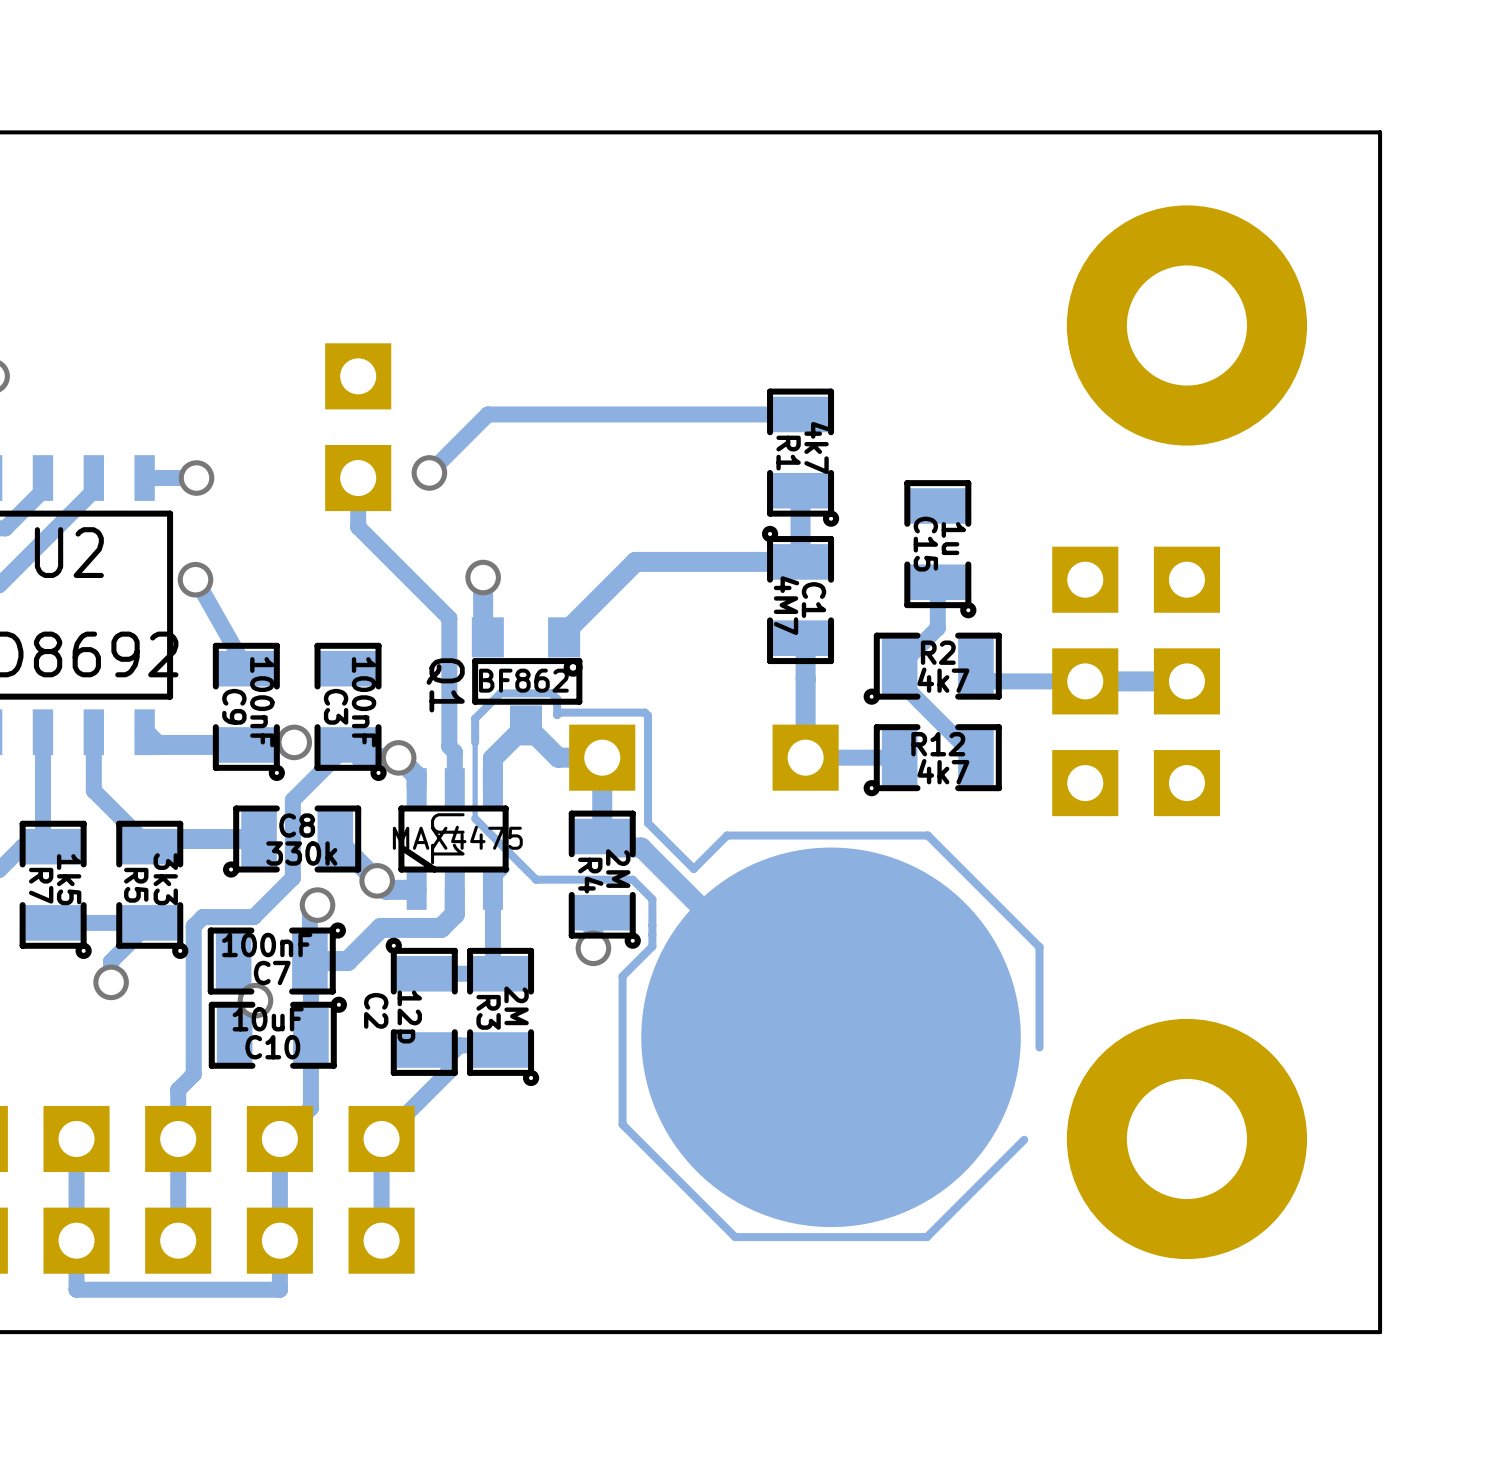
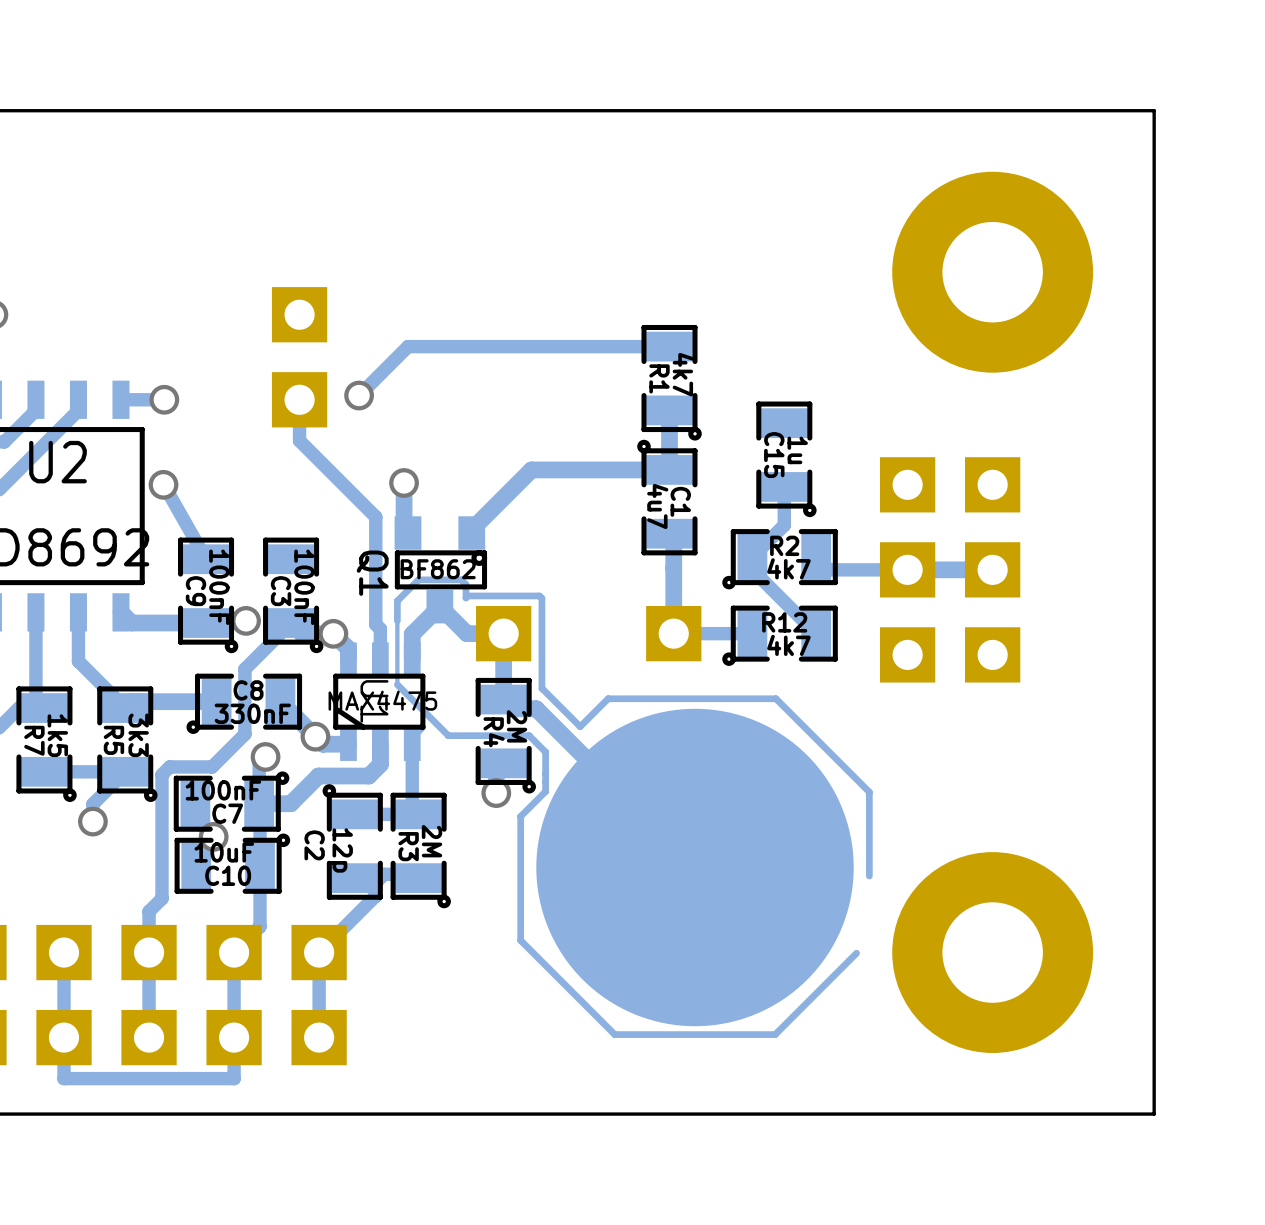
C1 value: 4M7 (786, 605) -> 4u7 (657, 506)
C8 value: 330k (301, 853) -> 330nF (252, 713)

